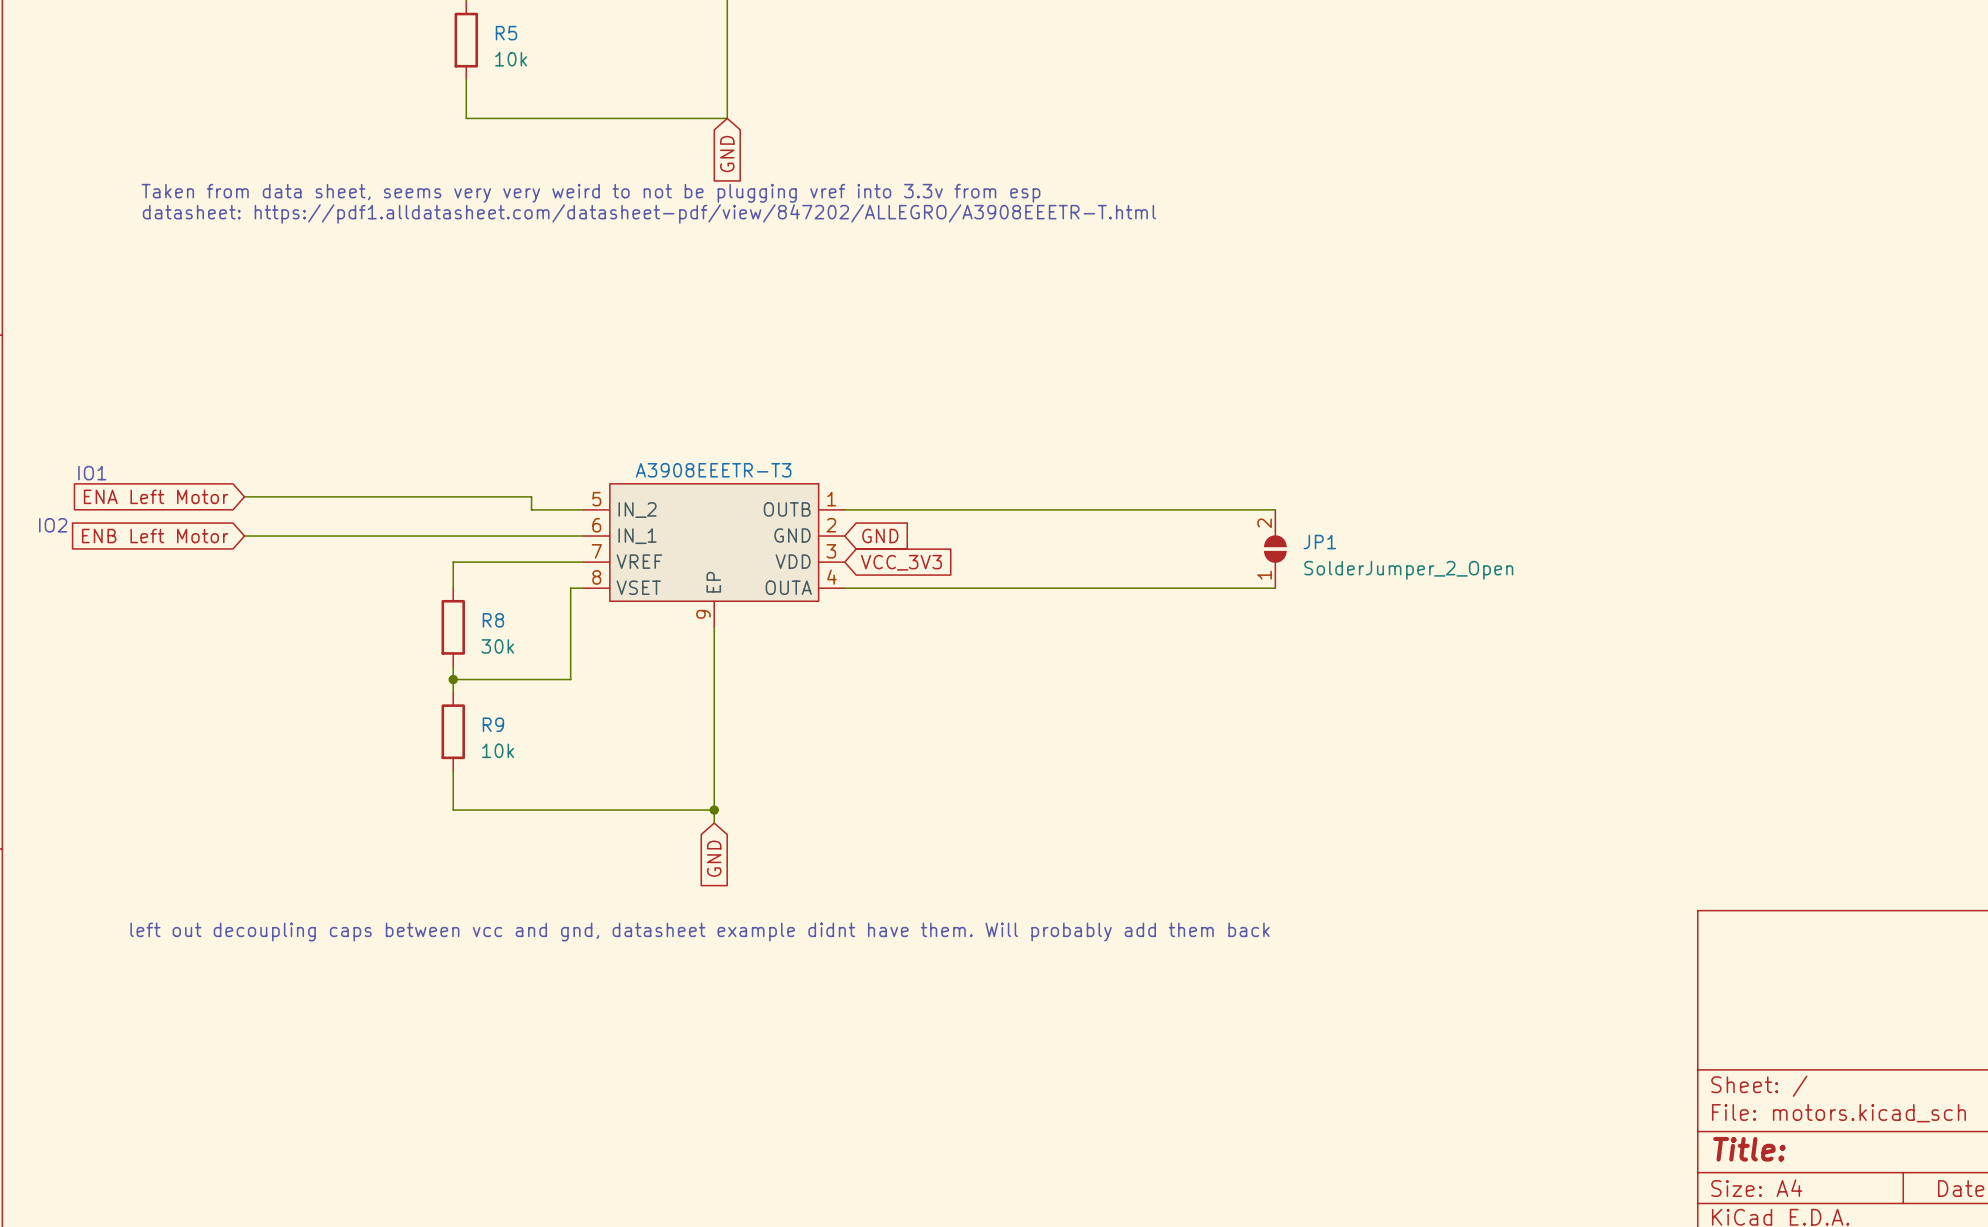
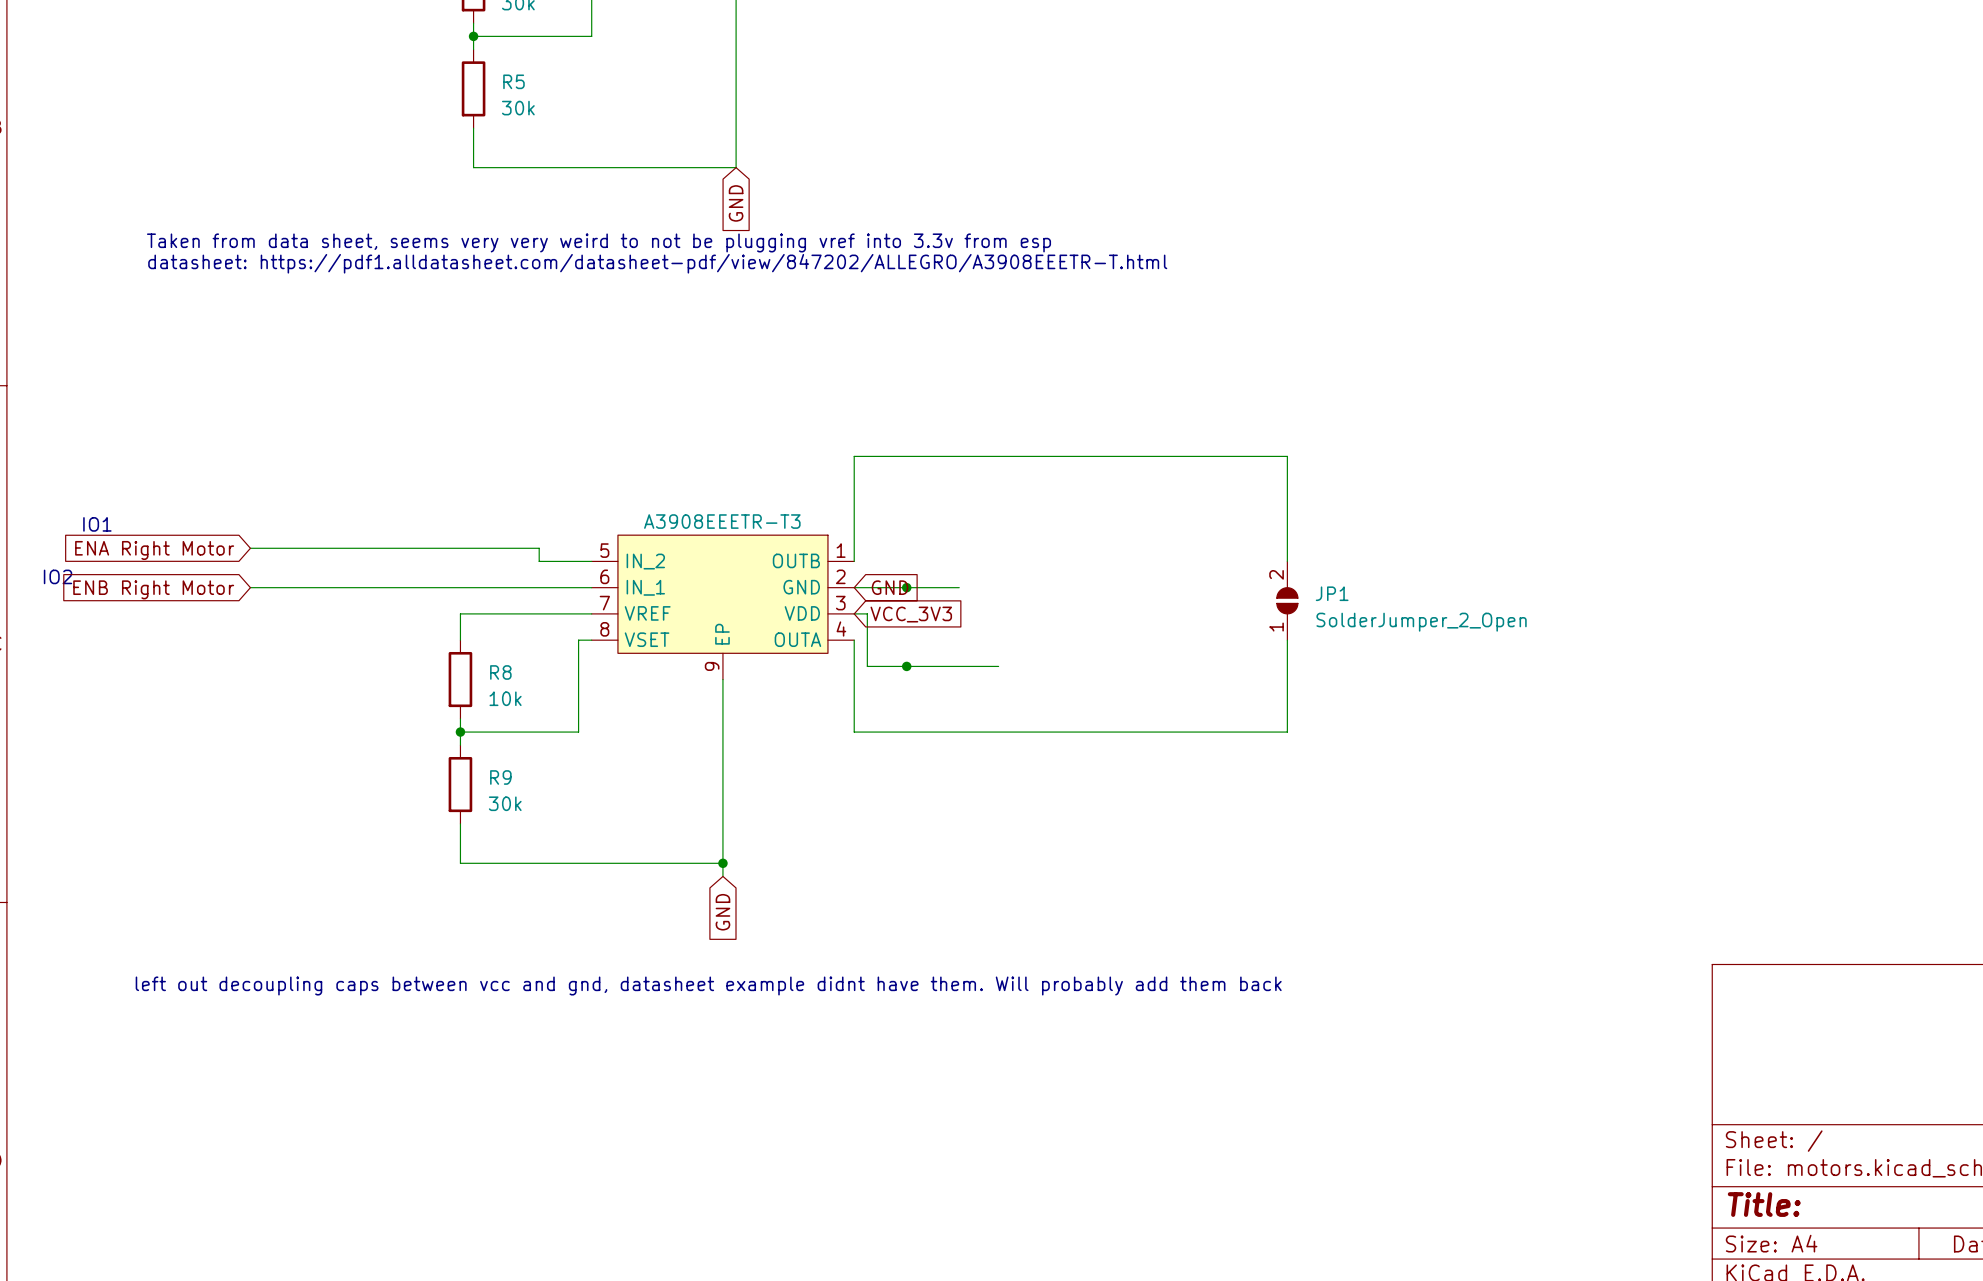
R5 value: 10k (511, 59) -> 30k (518, 108)
global label: ENA Left Motor (156, 496) -> ENA Right Motor (154, 550)
wire: (844, 509) (1275, 509) -> (854, 561) (854, 456) (1287, 456) (1287, 561)
global label: ENB Left Motor (155, 536) -> ENB Right Motor (153, 589)
wire: none -> (854, 587) (959, 587)
junction: none -> (906, 587)
wire: none -> (854, 613) (867, 613) (867, 666) (998, 666)
wire: (844, 588) (1275, 588) -> (854, 640) (854, 732) (1287, 732) (1287, 640)
junction: none -> (906, 666)
R8 value: 30k (497, 646) -> 10k (505, 698)
R9 value: 10k (498, 750) -> 30k (505, 803)

